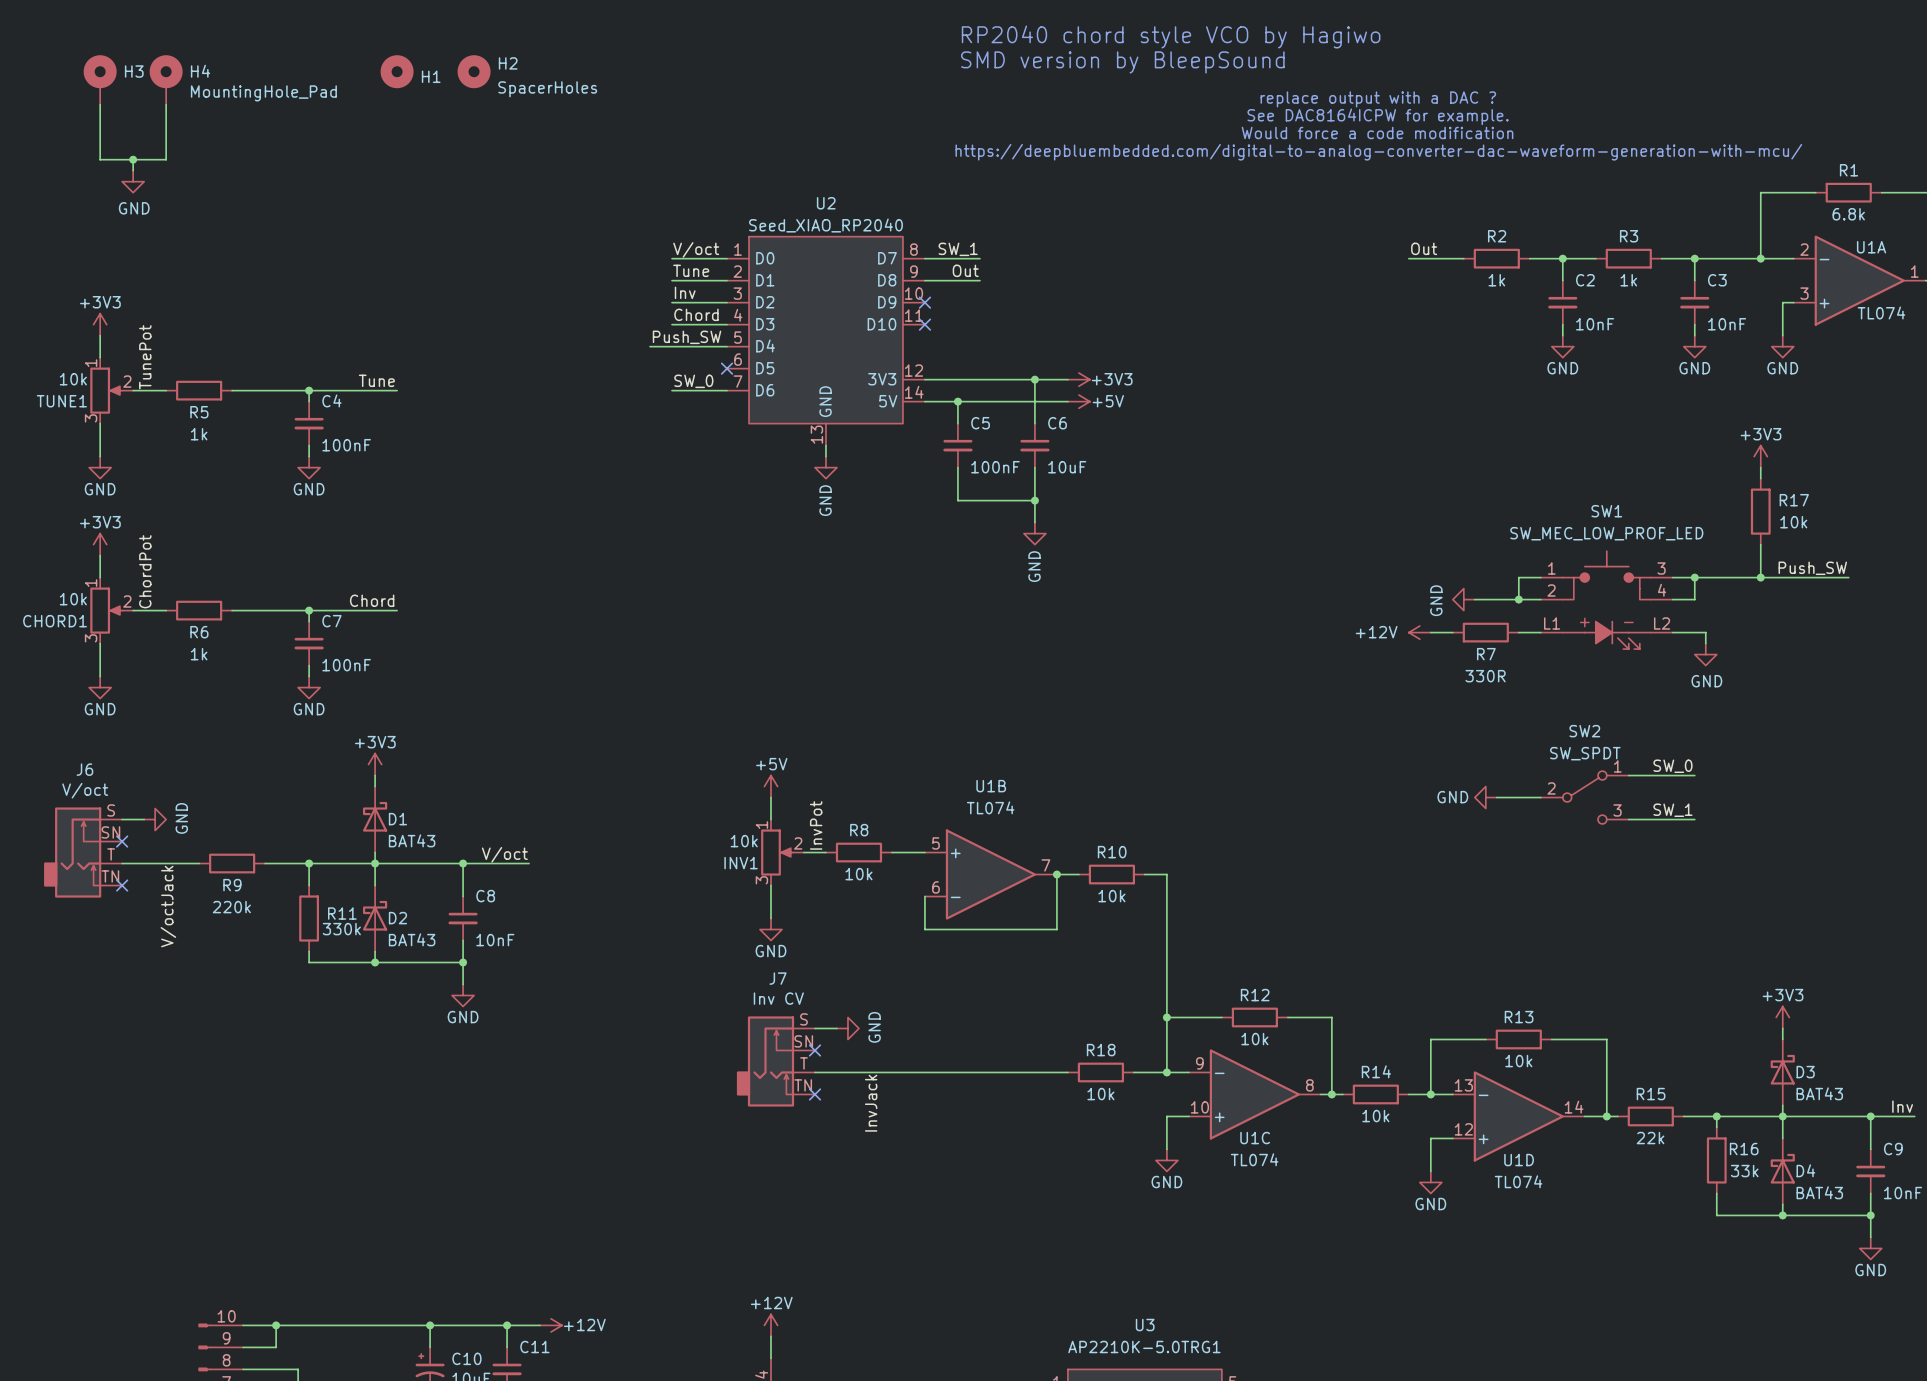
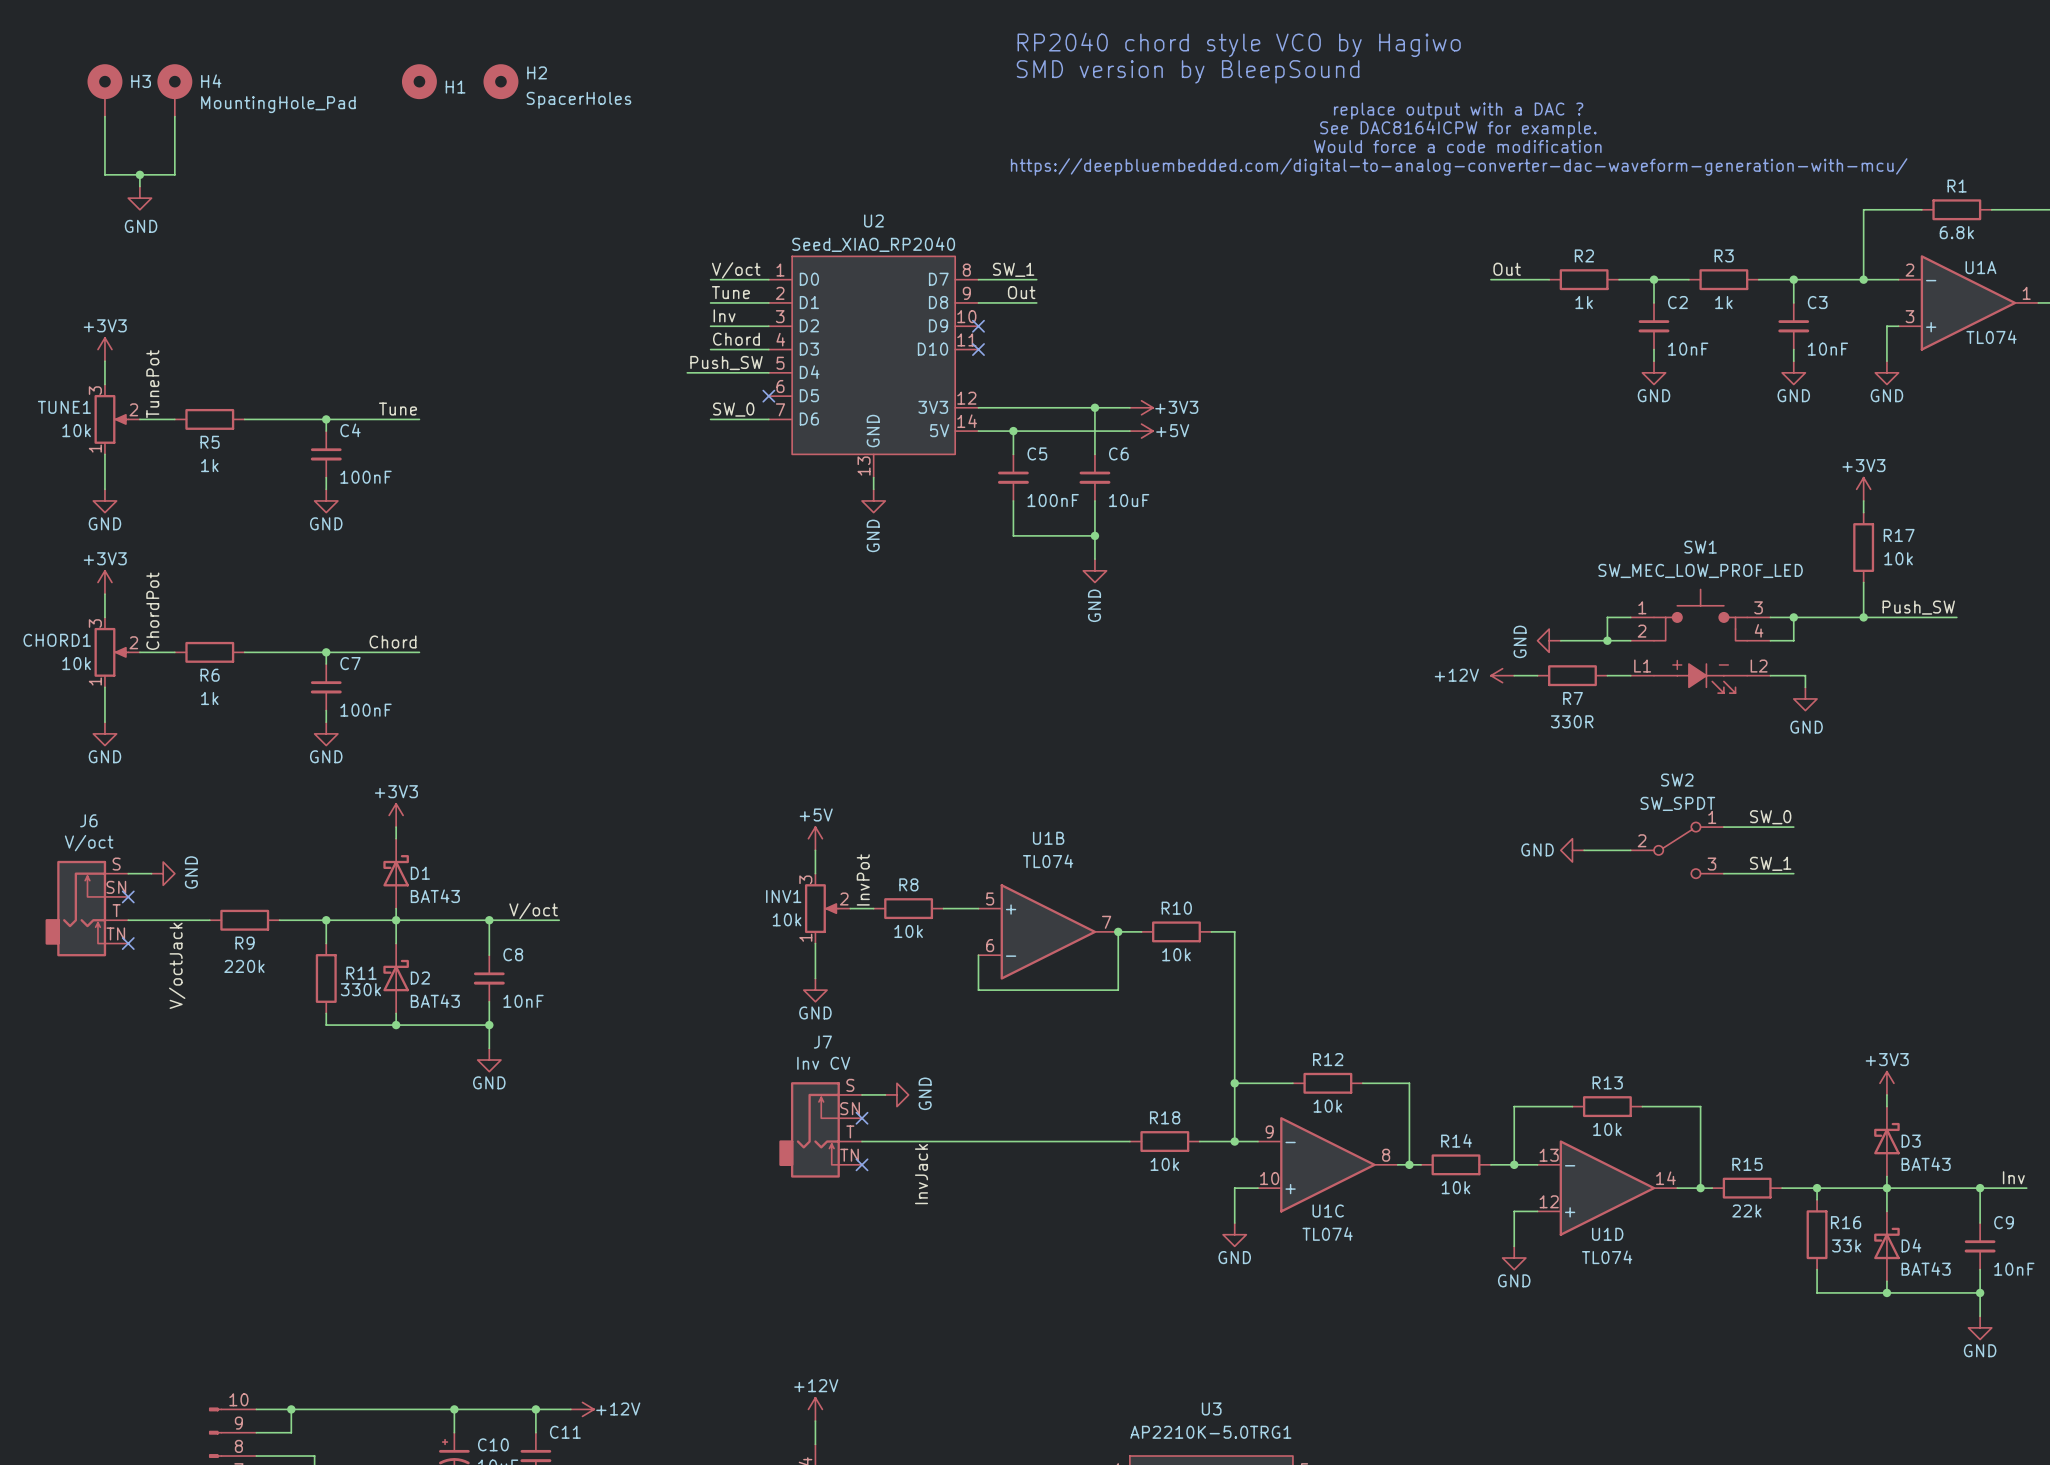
TUNE1 flip: as is (106, 390) -> up-down (111, 419)
CHORD1 flip: as is (106, 610) -> up-down (111, 652)
INV1 flip: as is (777, 852) -> up-down (821, 908)

